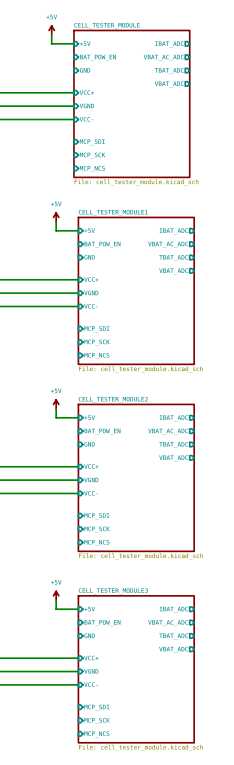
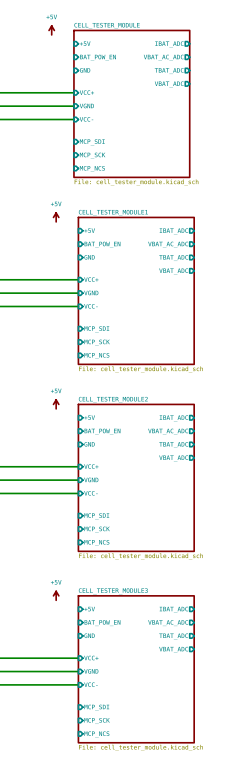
wire: (51, 34) (51, 43) (73, 43) -> none
wire: (56, 221) (56, 230) (78, 230) -> none
wire: (56, 408) (56, 417) (78, 417) -> none
wire: (56, 600) (56, 609) (78, 609) -> none

